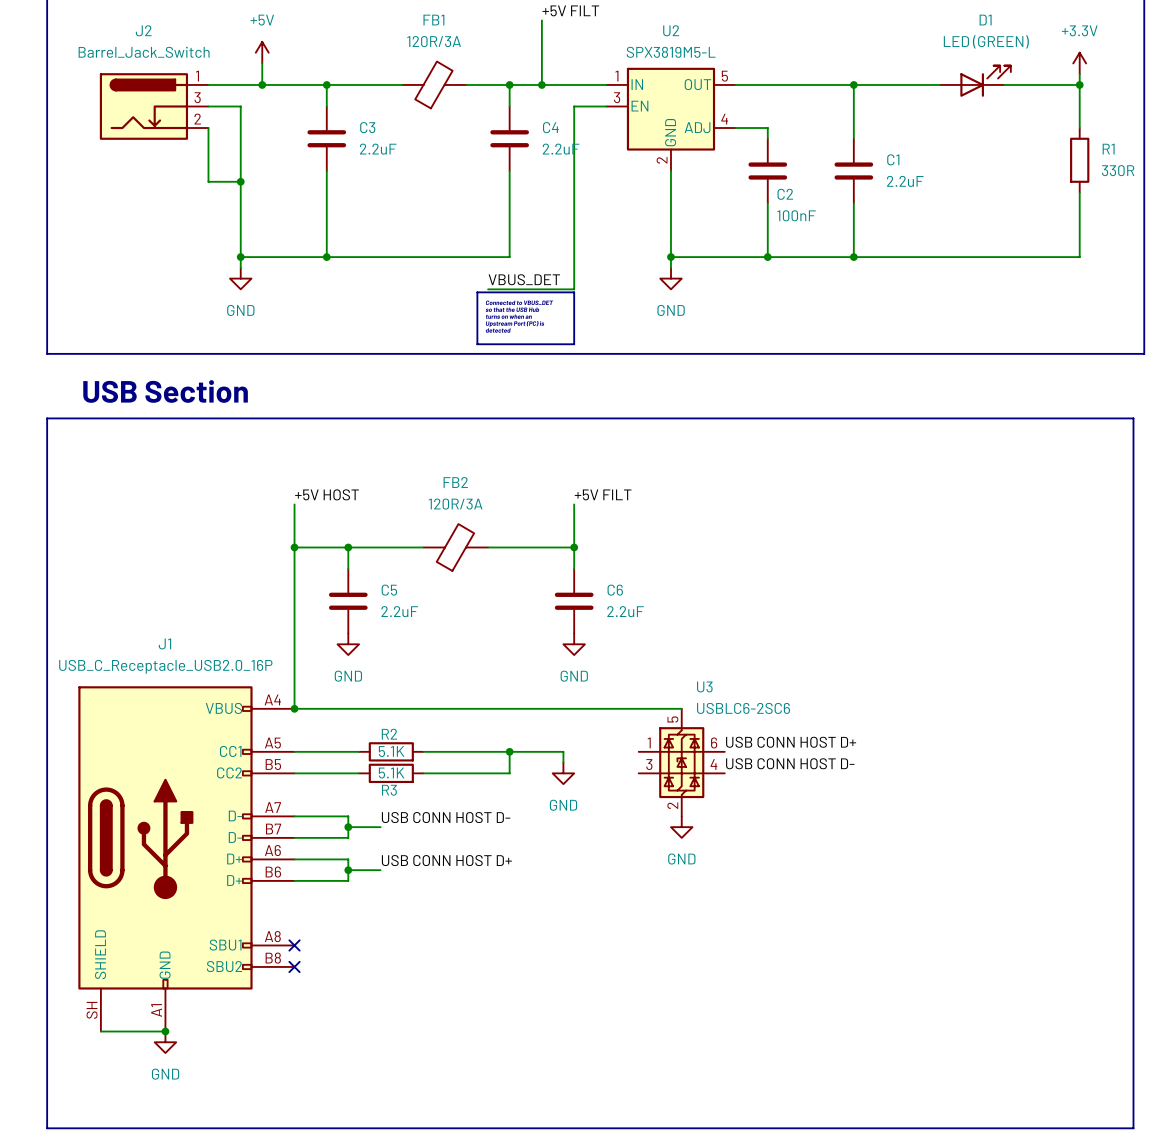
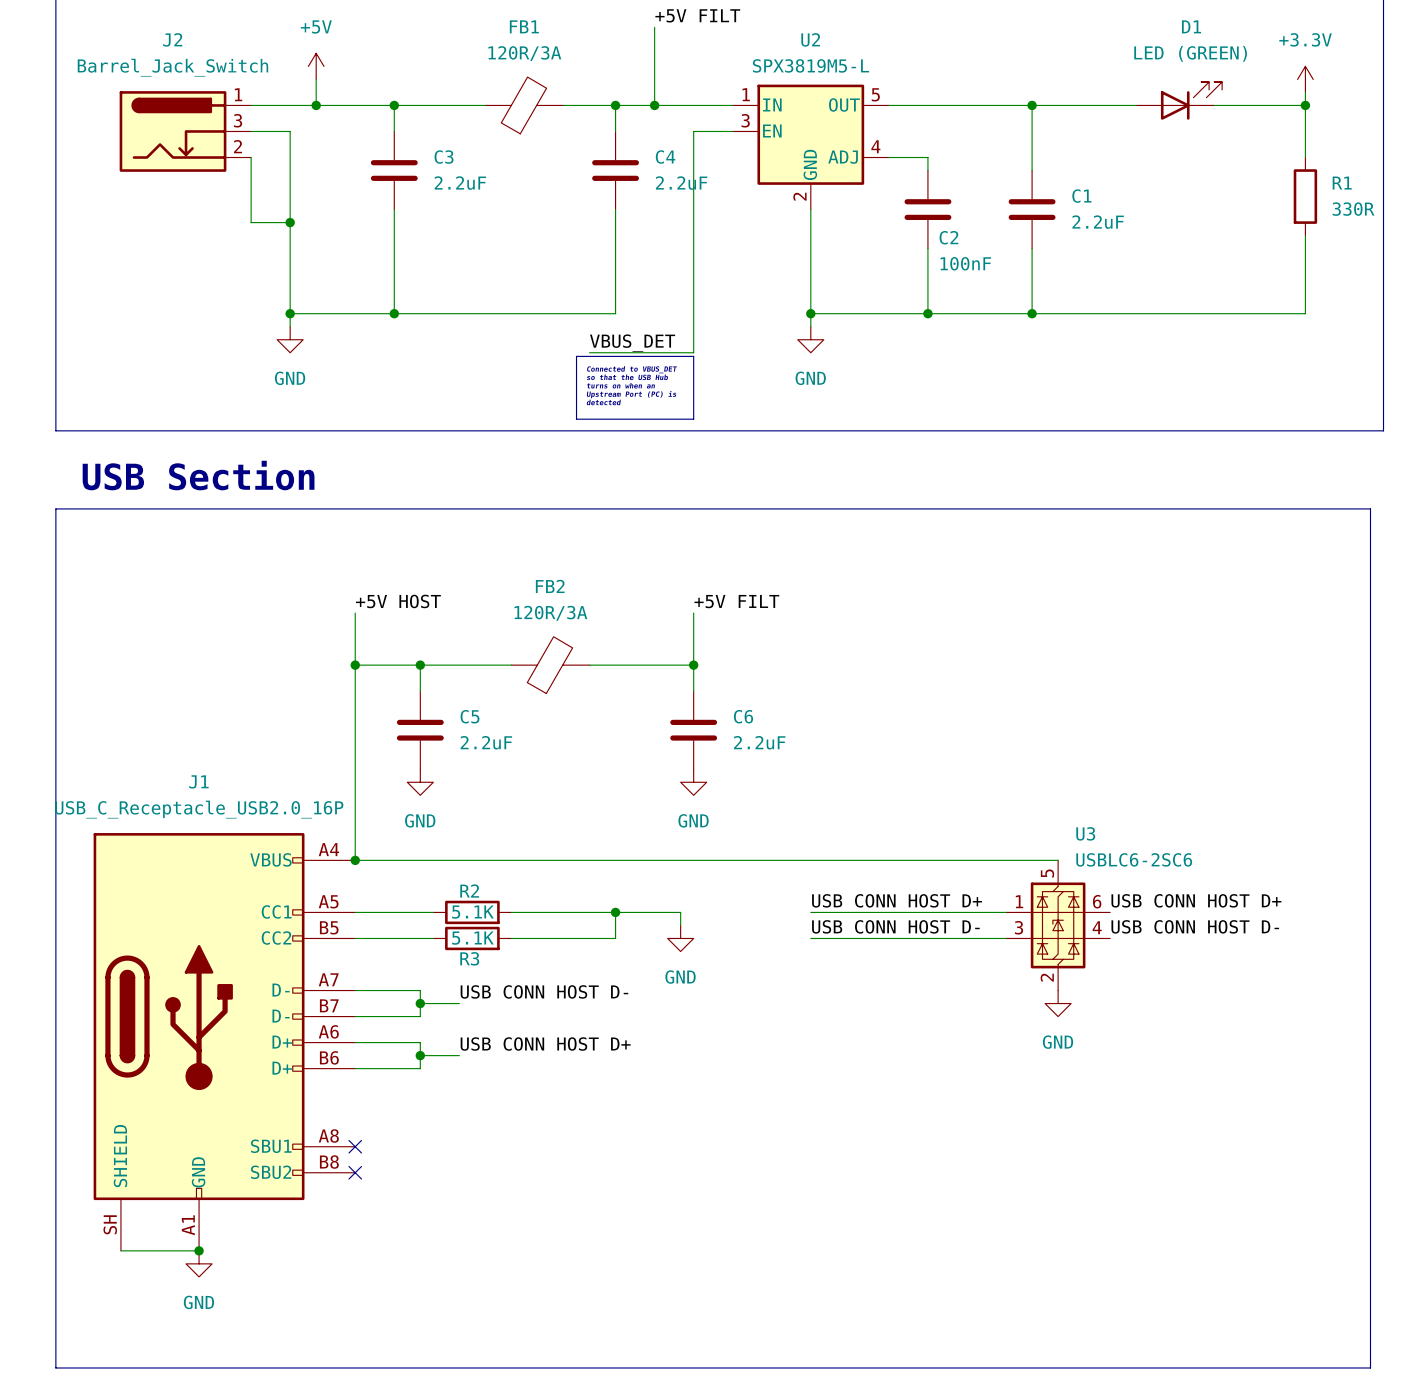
wire: none -> (823, 860) (1058, 860)
label position: USB CONN HOST D+ (791, 742) -> USB CONN HOST D+ (897, 900)
label: none -> USB CONN HOST D+ (1196, 900)
wire: none -> (810, 912) (1006, 912)
U3 position: (681, 762) -> (1058, 925)
label position: USB CONN HOST D- (790, 763) -> USB CONN HOST D- (895, 926)
label: none -> USB CONN HOST D- (1195, 926)
wire: none -> (810, 938) (1006, 938)
power symbol position: GND (681, 827) -> GND (1058, 1003)

